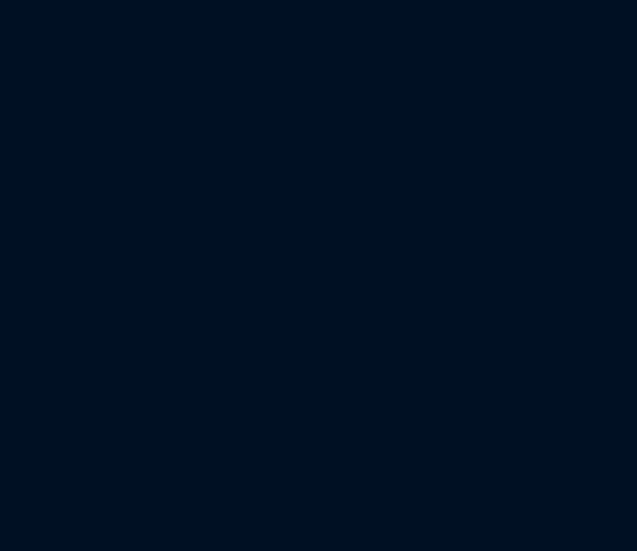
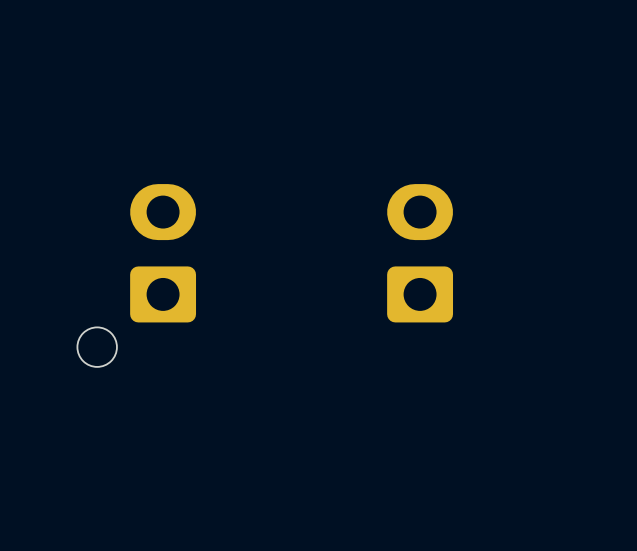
part: none -> (420, 253)
part: none -> (136, 275)

